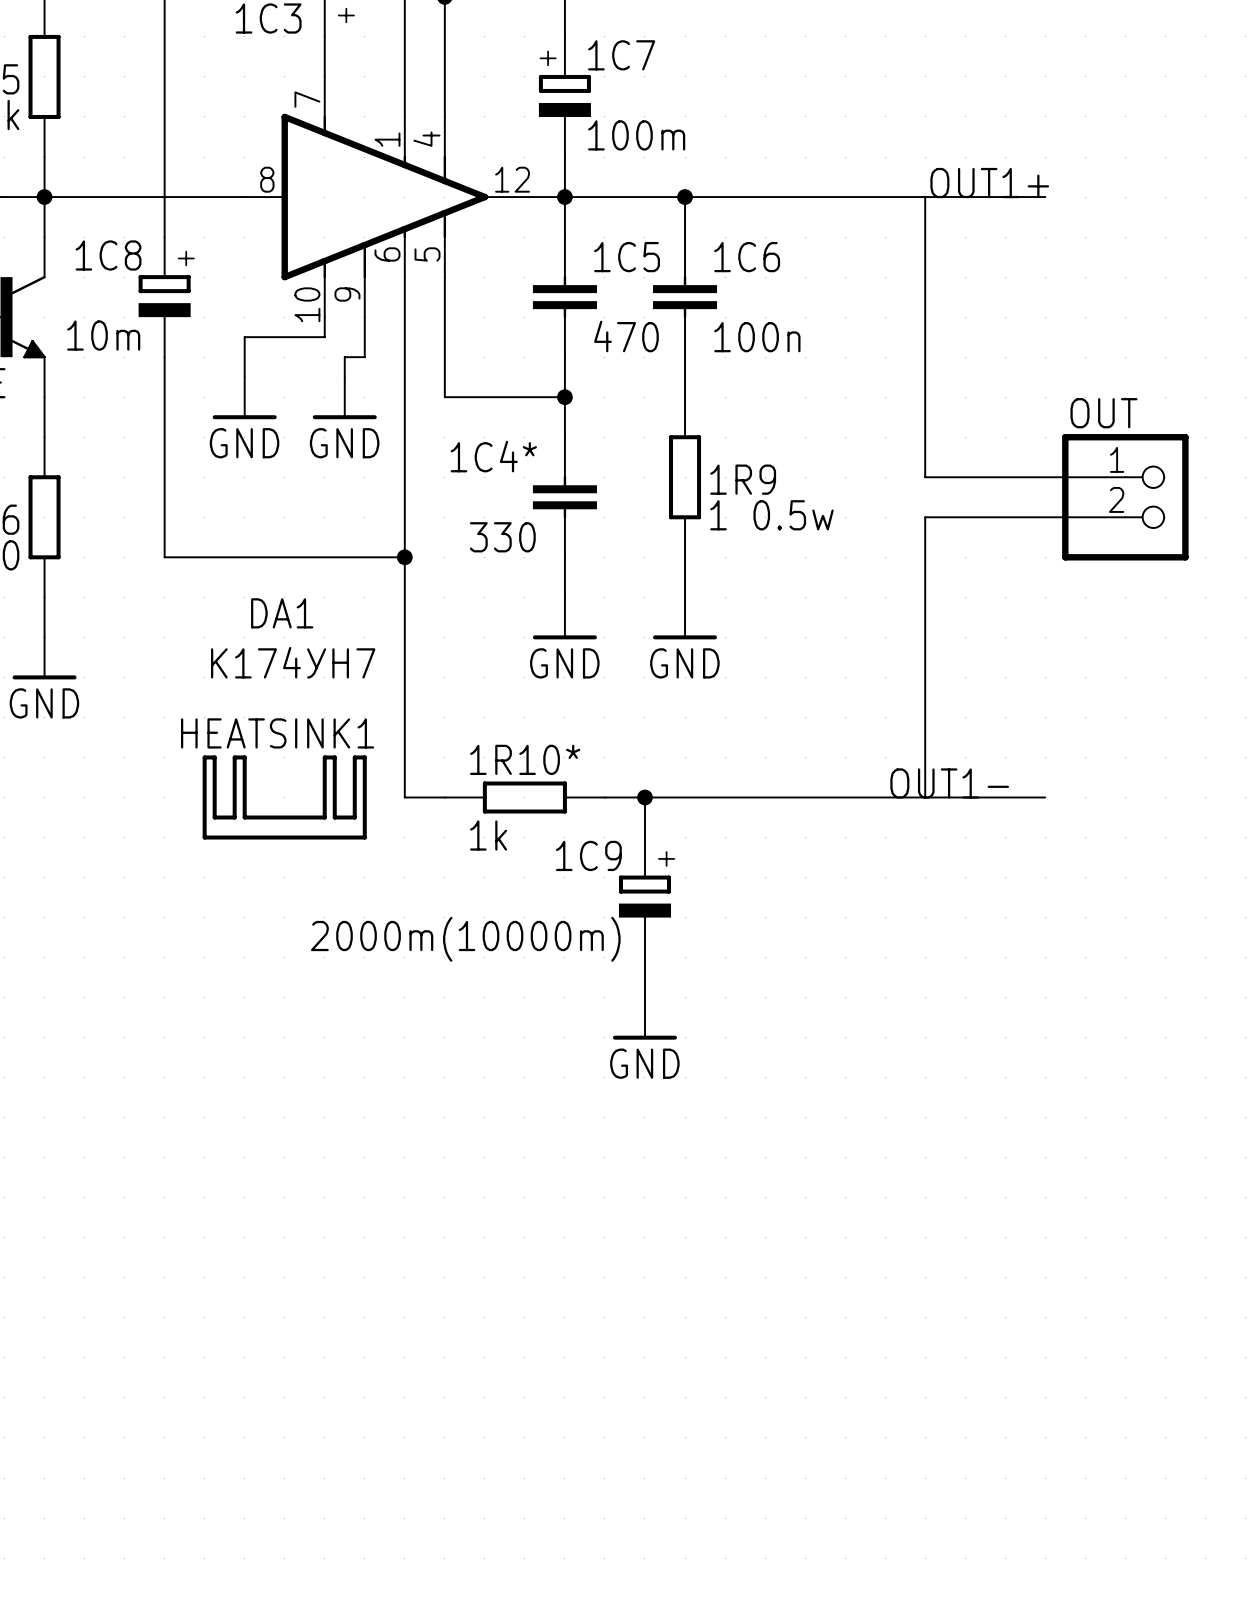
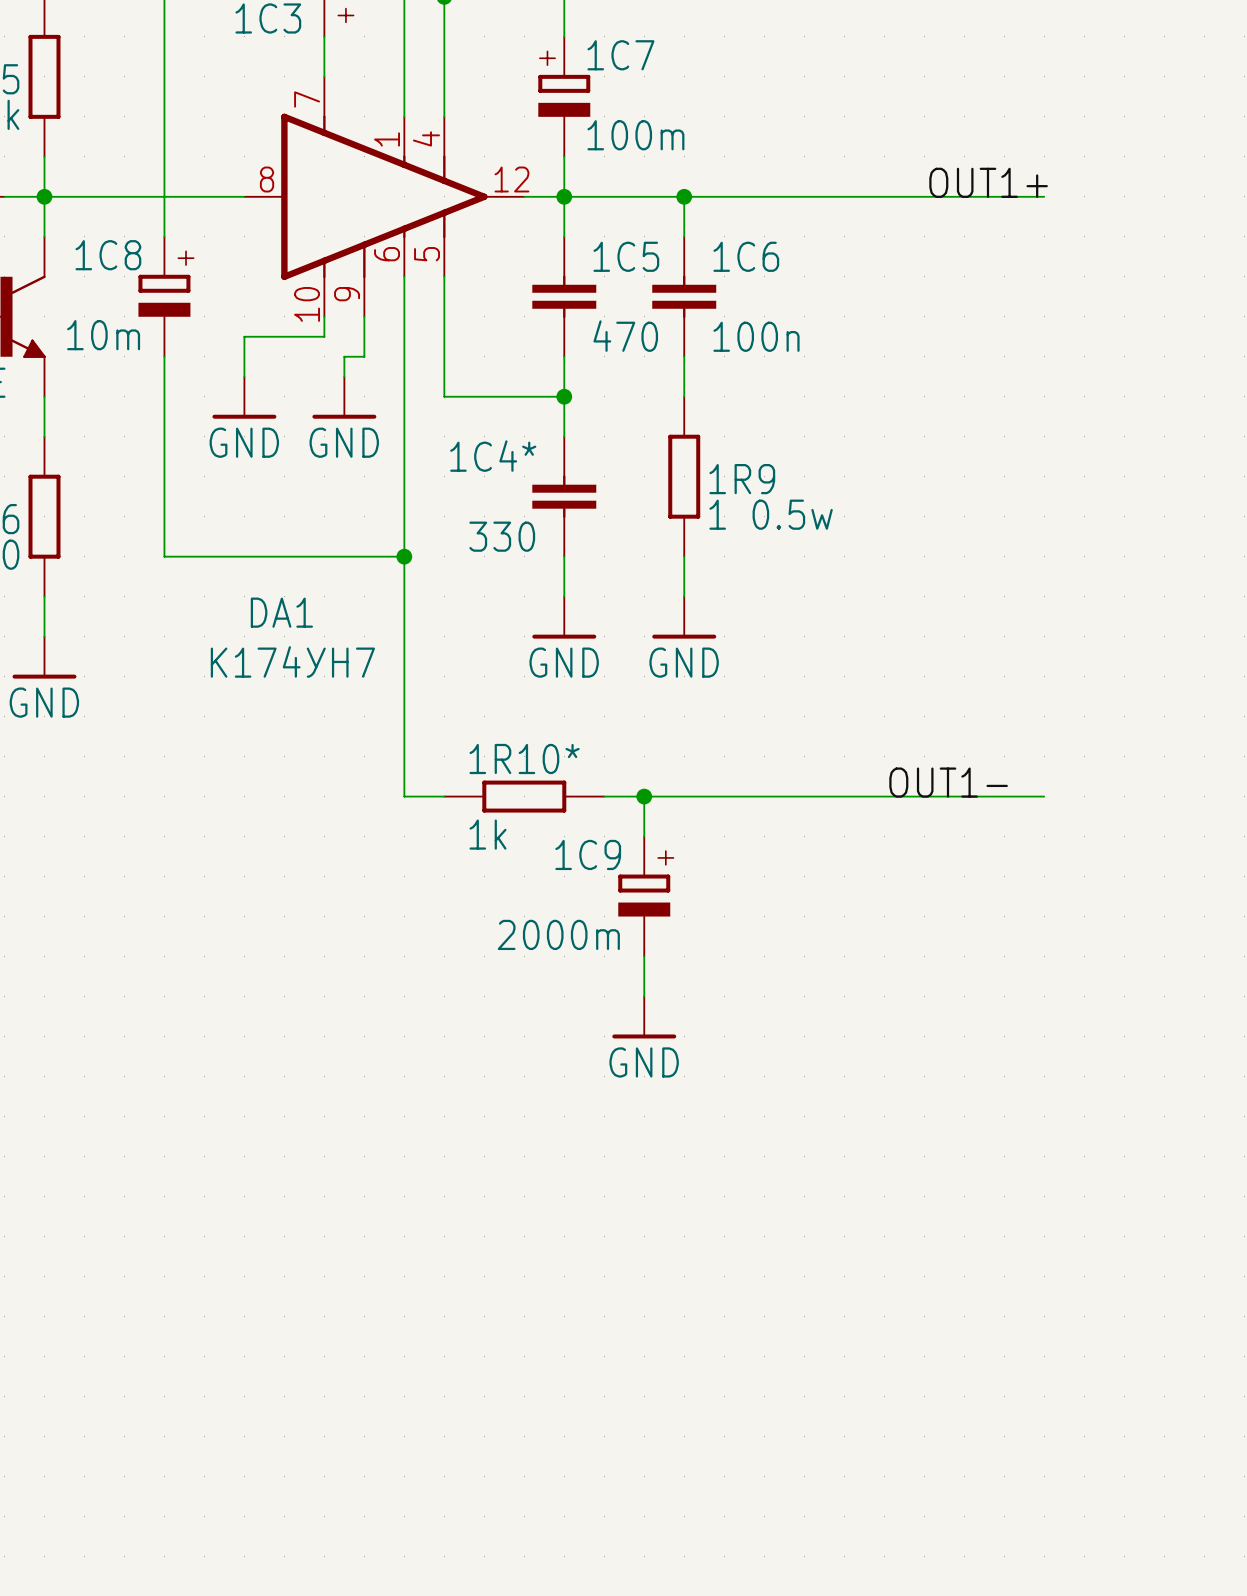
wire: (925, 197) (925, 477) (1125, 477) -> none
OUT: (1125, 497) -> none
wire: (1125, 517) (925, 517) (925, 797) -> none
HEATSINK1: (284, 797) -> none
1C9 value: 2000m(10000m) (465, 939) -> 2000m (558, 934)

